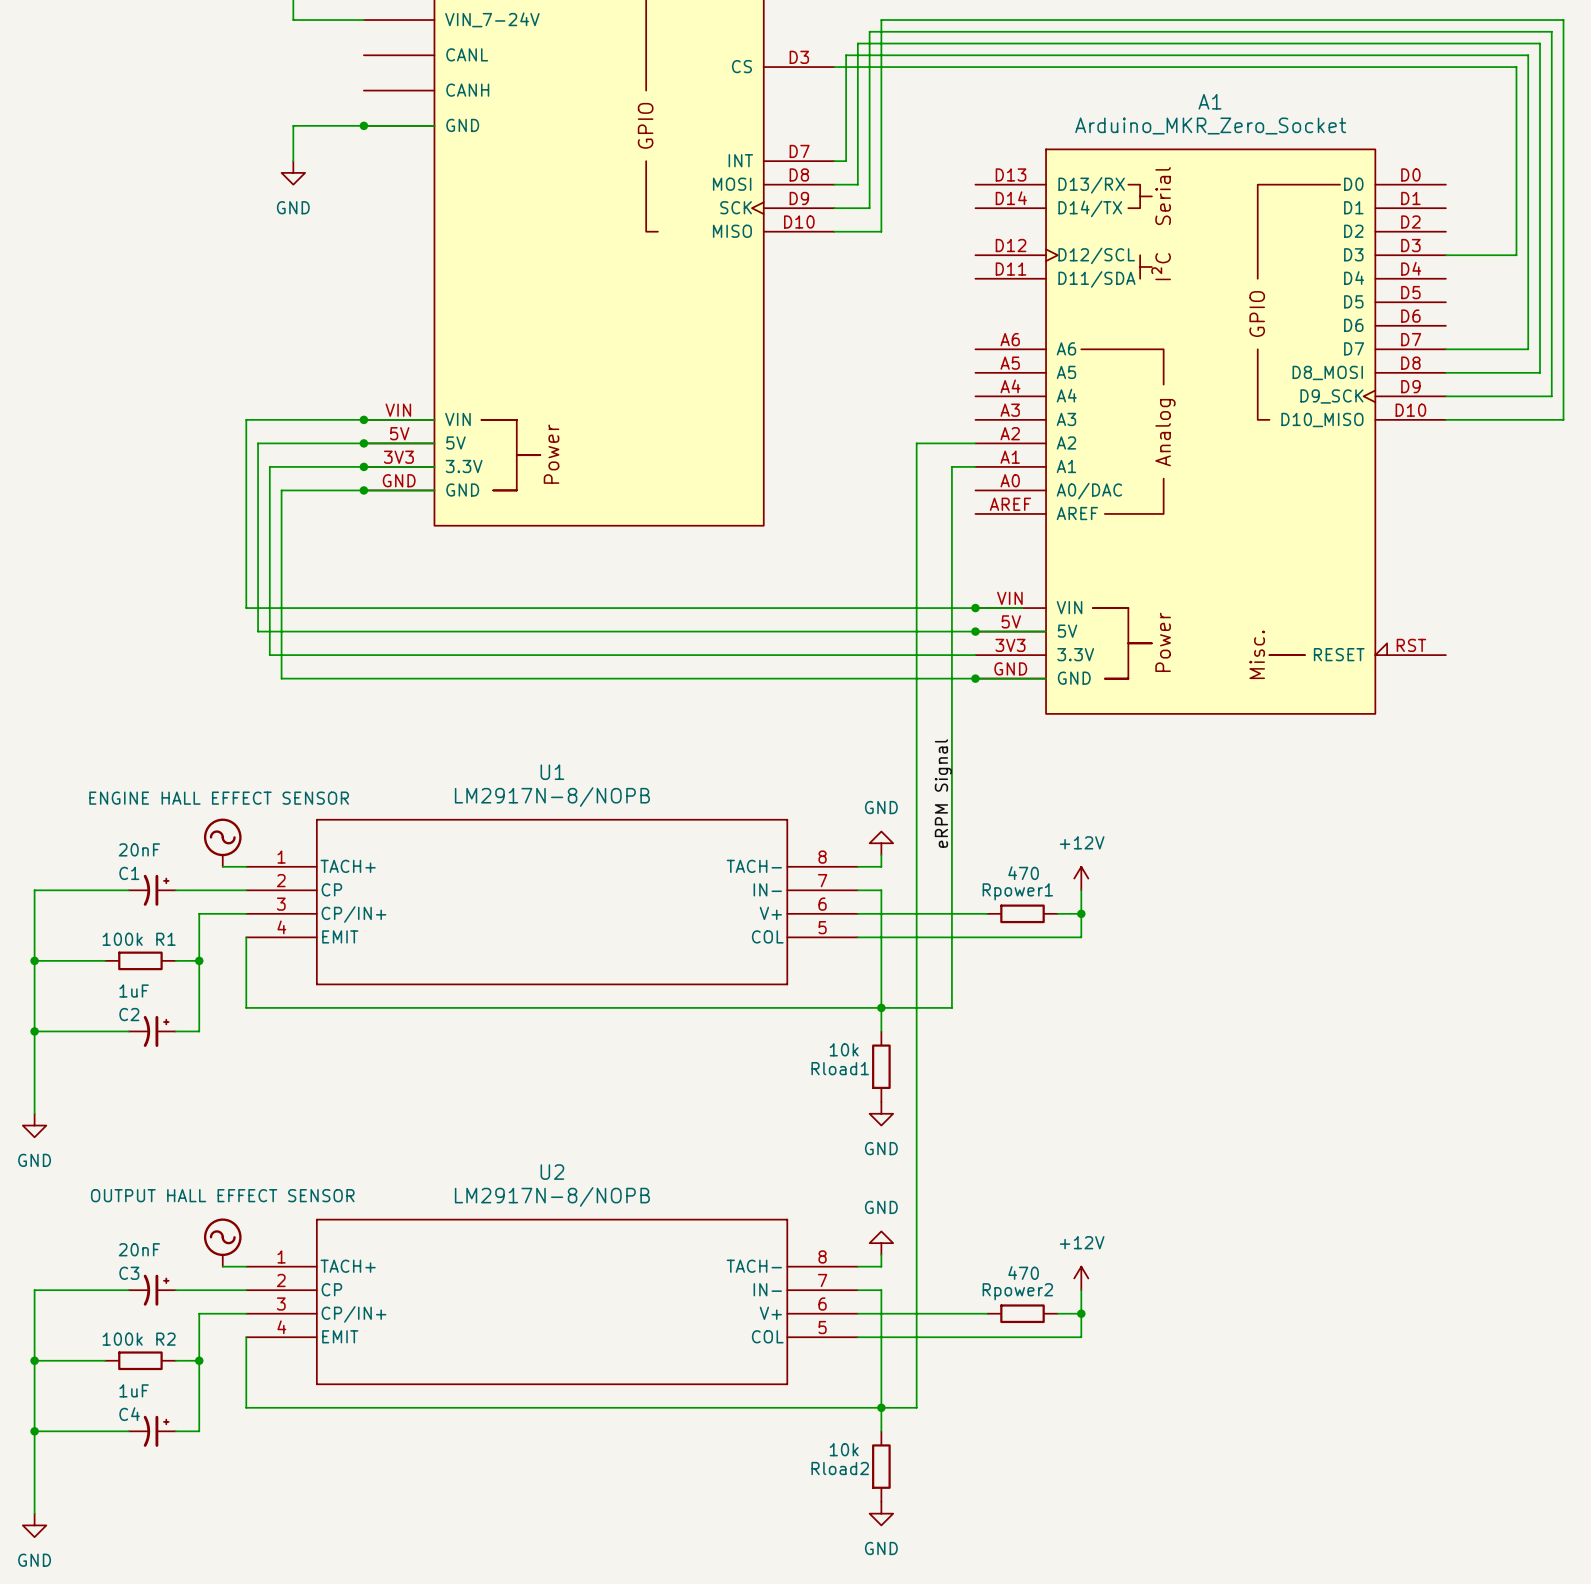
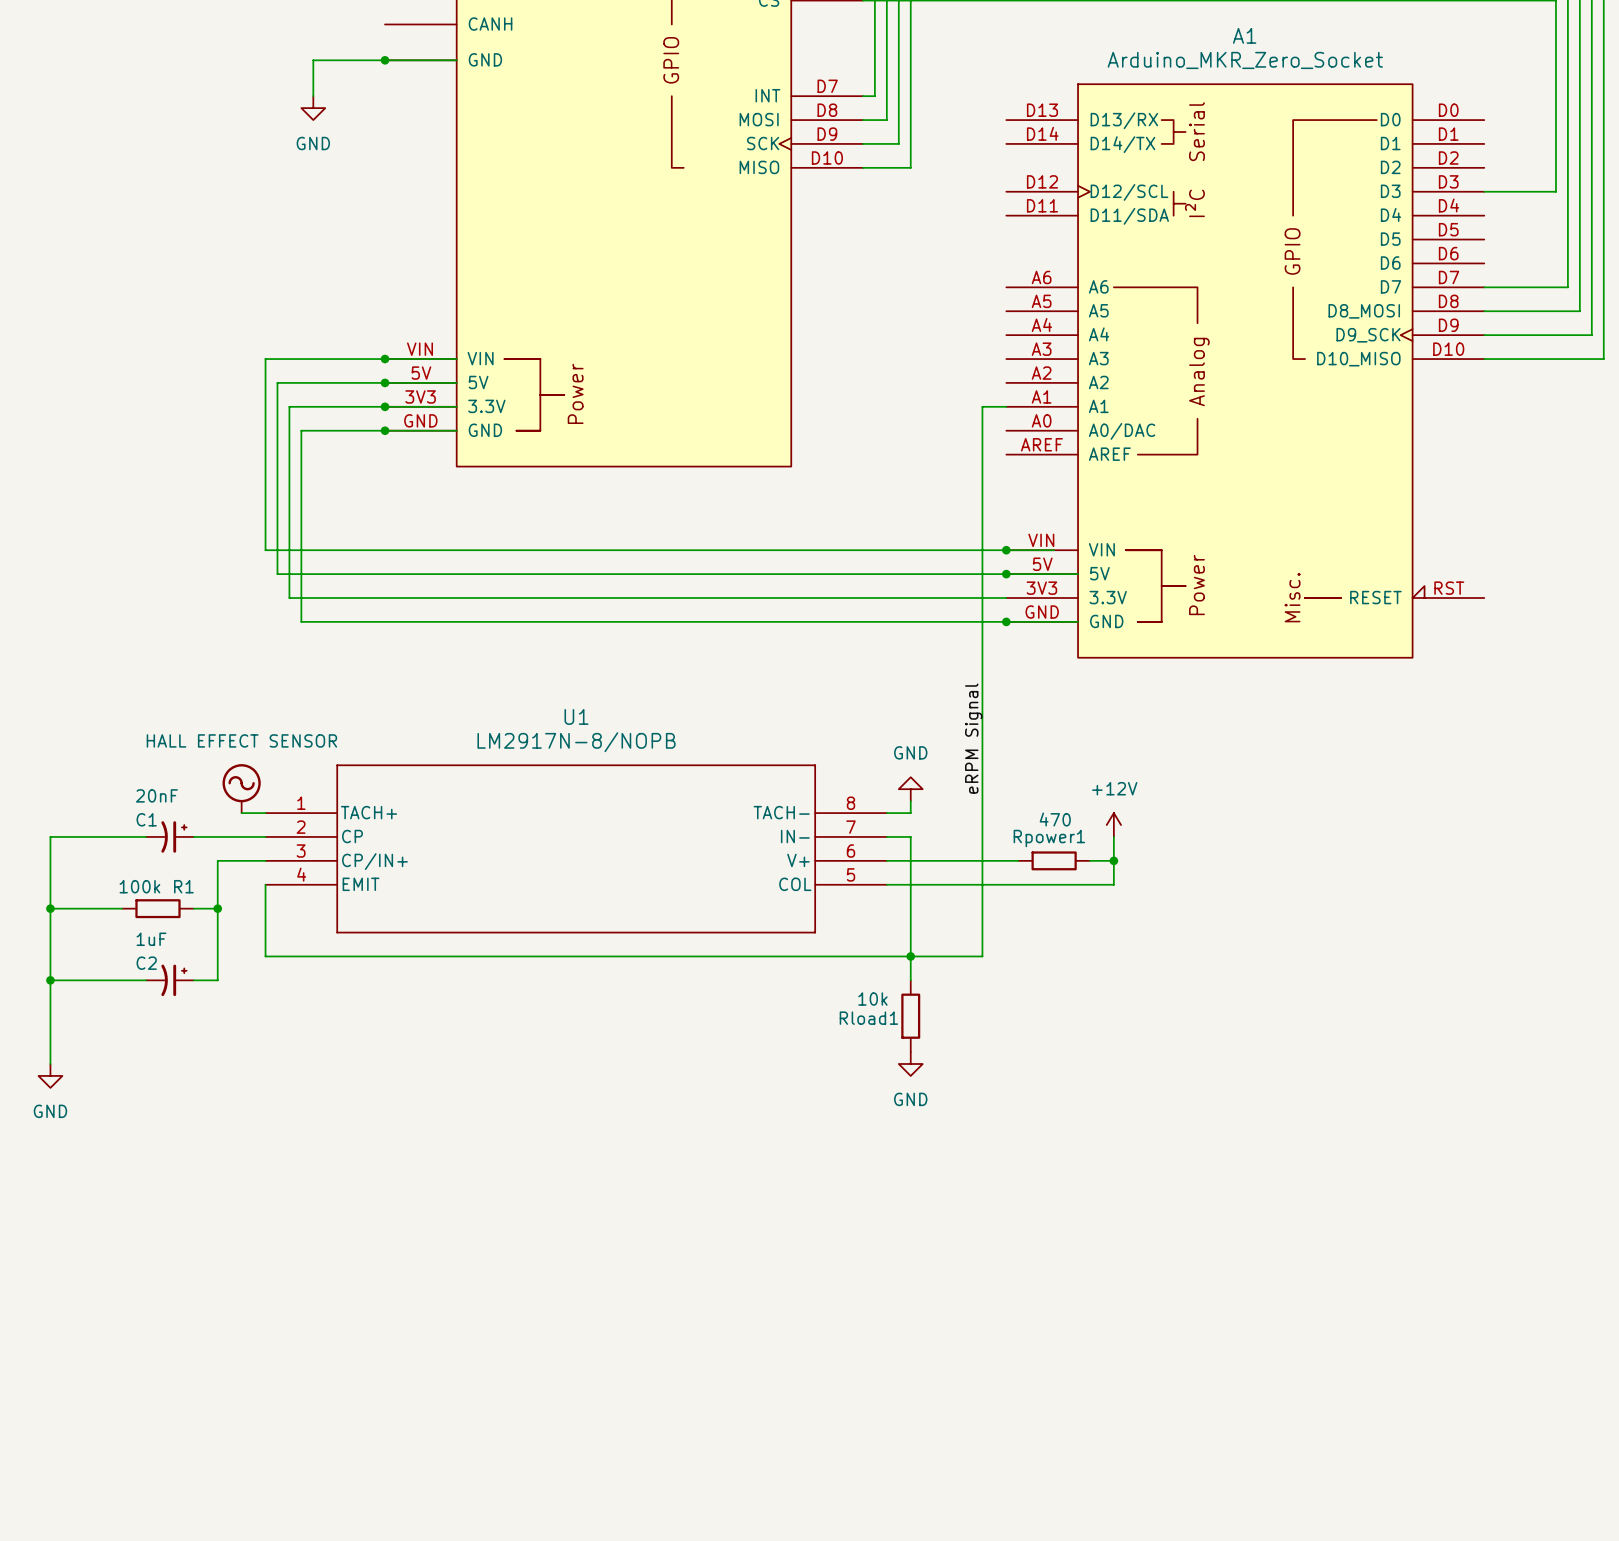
wire: (975, 443) (916, 443) (916, 1407) (246, 1407) (246, 1337) -> none
power symbol: ENGINE HALL EFFECT SENSOR (222, 842) -> HALL EFFECT SENSOR (241, 788)
power symbol: OUTPUT HALL EFFECT SENSOR (222, 1242) -> none
power symbol: GND (881, 1243) -> none
wire: (881, 1254) (881, 1266) (857, 1266) -> none
wire: (222, 1266) (246, 1266) -> none
power symbol: +12V (1081, 1278) -> none
wire: (128, 1290) (34, 1290) (34, 1513) -> none
C3: 20nF (152, 1290) -> none
wire: (175, 1290) (246, 1290) -> none
wire: (857, 1290) (881, 1290) (881, 1431) -> none
wire: (1081, 1290) (1081, 1337) (857, 1337) -> none
U2: LM2917N-8/NOPB (552, 1301) -> none
wire: (246, 1313) (199, 1313) (199, 1431) (175, 1431) -> none
wire: (857, 1313) (987, 1313) -> none
Rpower2: 470 (1022, 1313) -> none
wire: (1057, 1313) (1081, 1313) -> none
junction: (1081, 1313) -> none
wire: (34, 1360) (105, 1360) -> none
junction: (34, 1360) -> none
R2: 100k (140, 1360) -> none
wire: (175, 1360) (199, 1360) -> none
junction: (199, 1360) -> none
junction: (881, 1407) -> none
wire: (34, 1431) (128, 1431) -> none
junction: (34, 1431) -> none
C4: 1uF (152, 1431) -> none
Rload2: 10k (881, 1466) -> none
power symbol: GND (881, 1513) -> none
power symbol: GND (34, 1525) -> none

